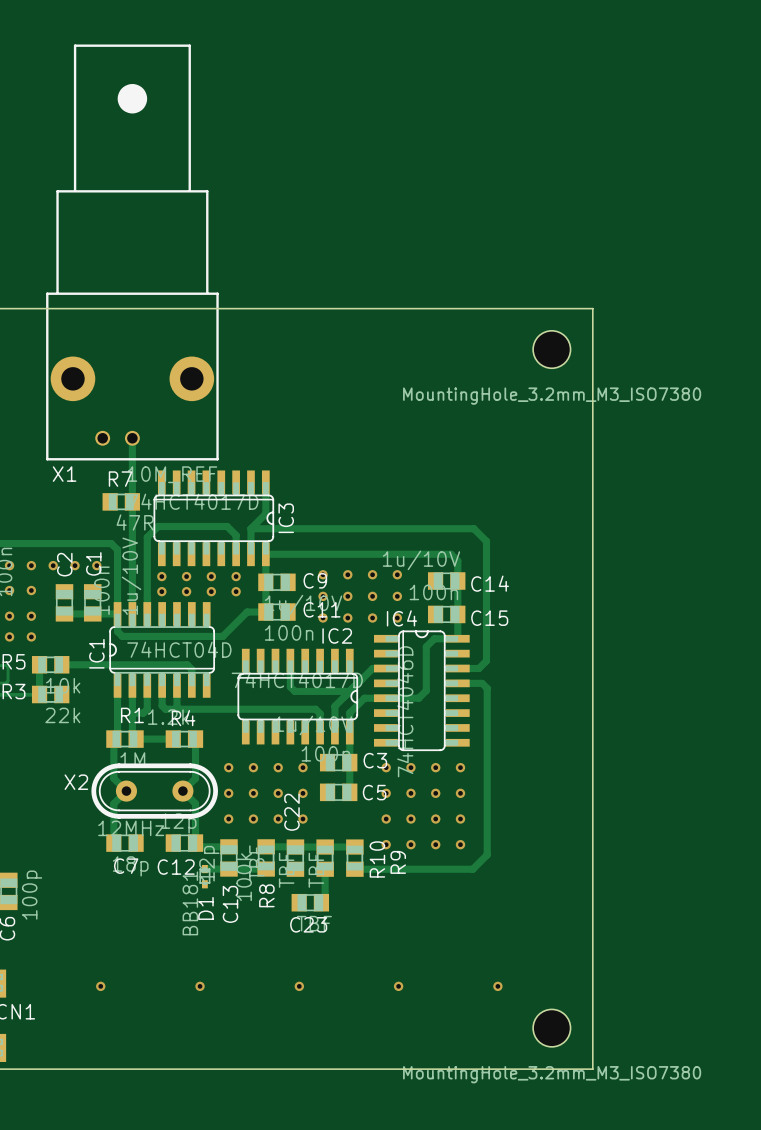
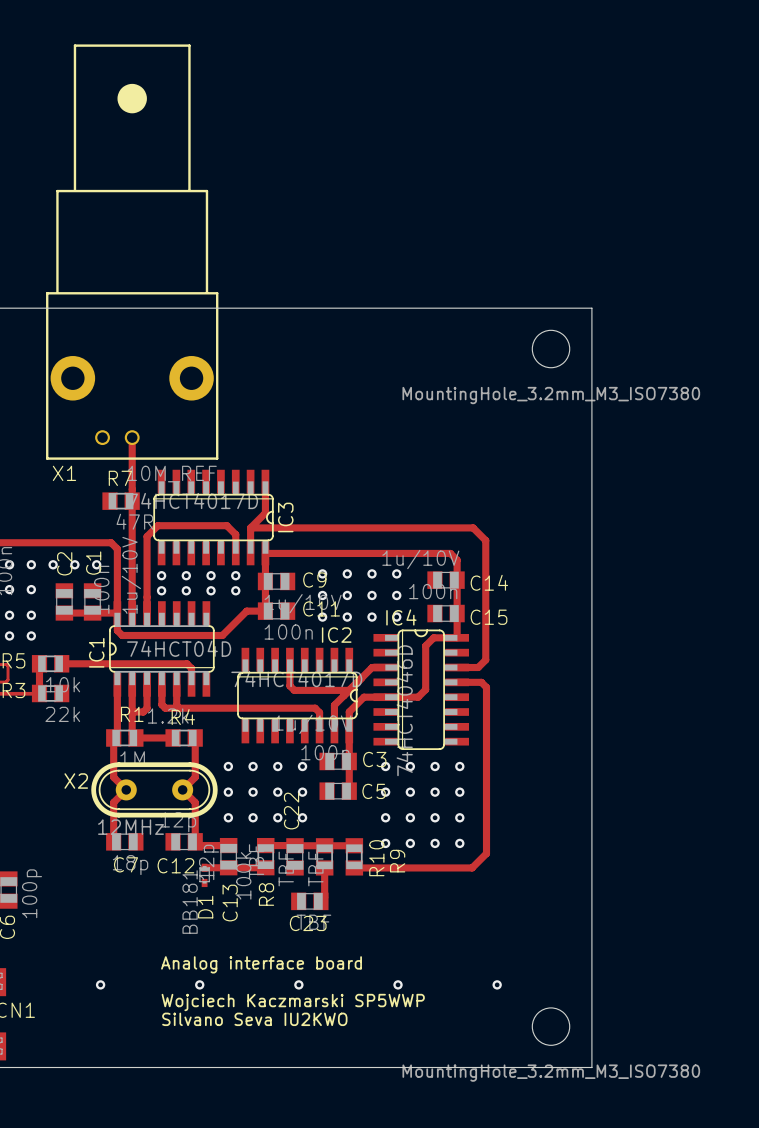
text: none -> Analog interface board (261, 964)
text: none -> Wojciech Kaczmarski SP5WWP (293, 1002)
text: none -> Silvano Seva IU2KWO (254, 1019)

